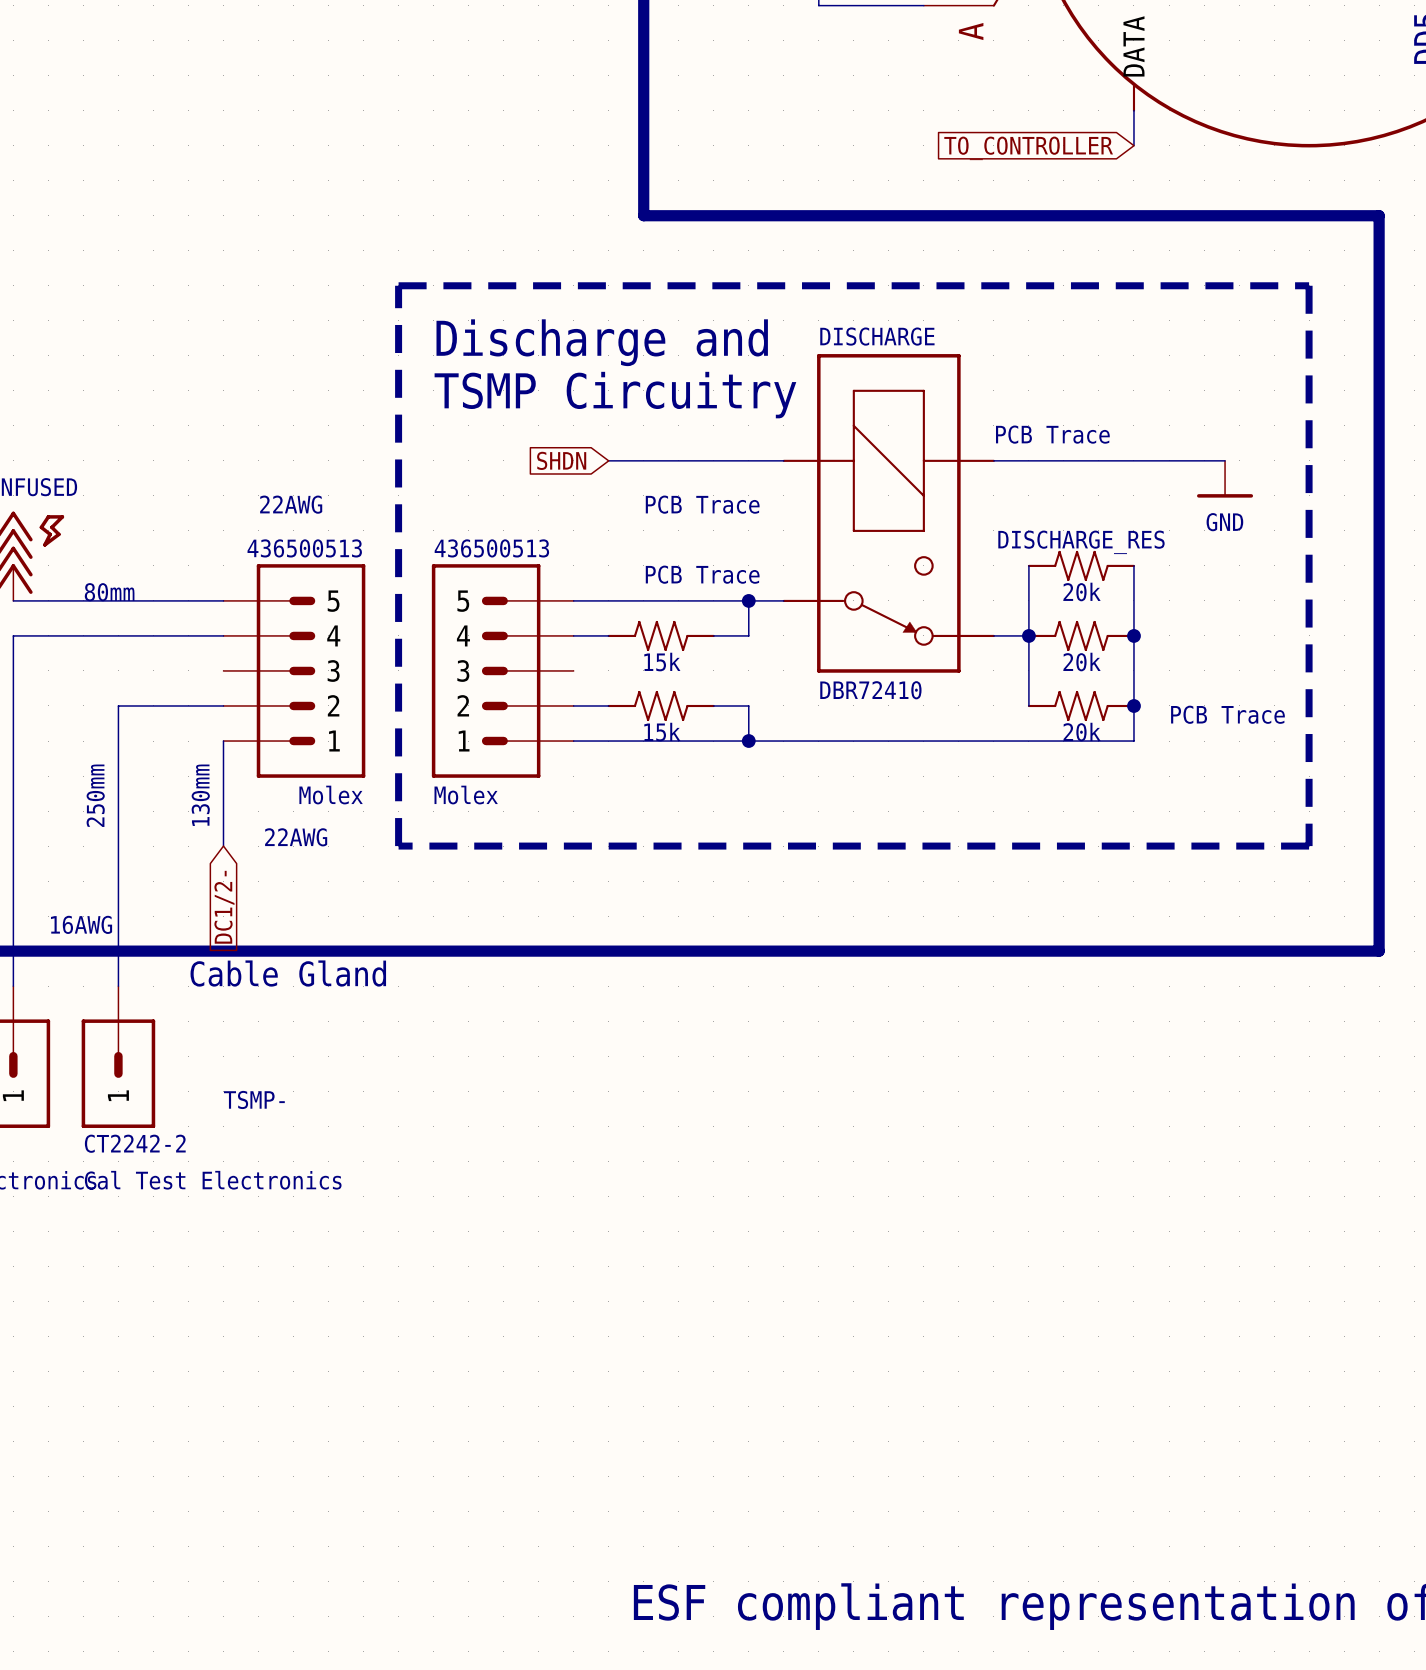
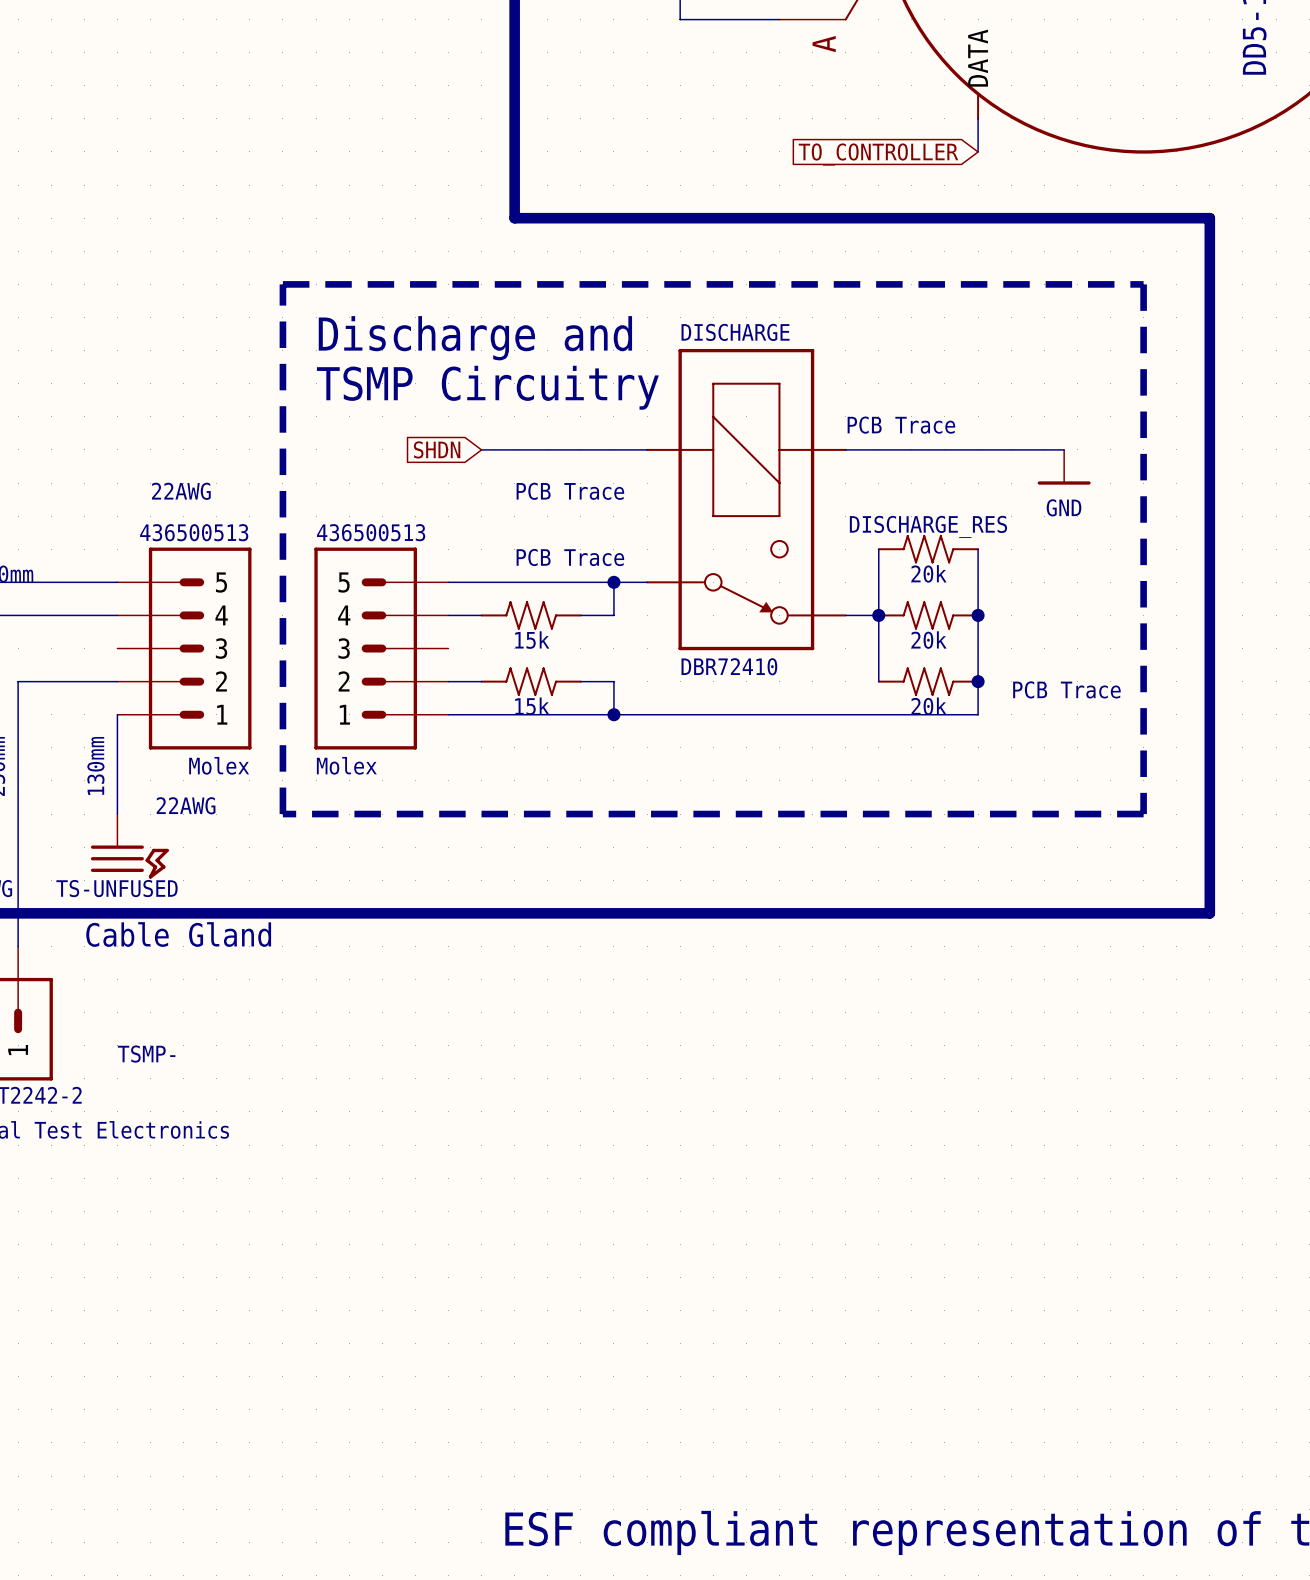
power symbol: none -> TS-UNFUSED (129, 846)
global label: DC1/2- (224, 907) -> none

